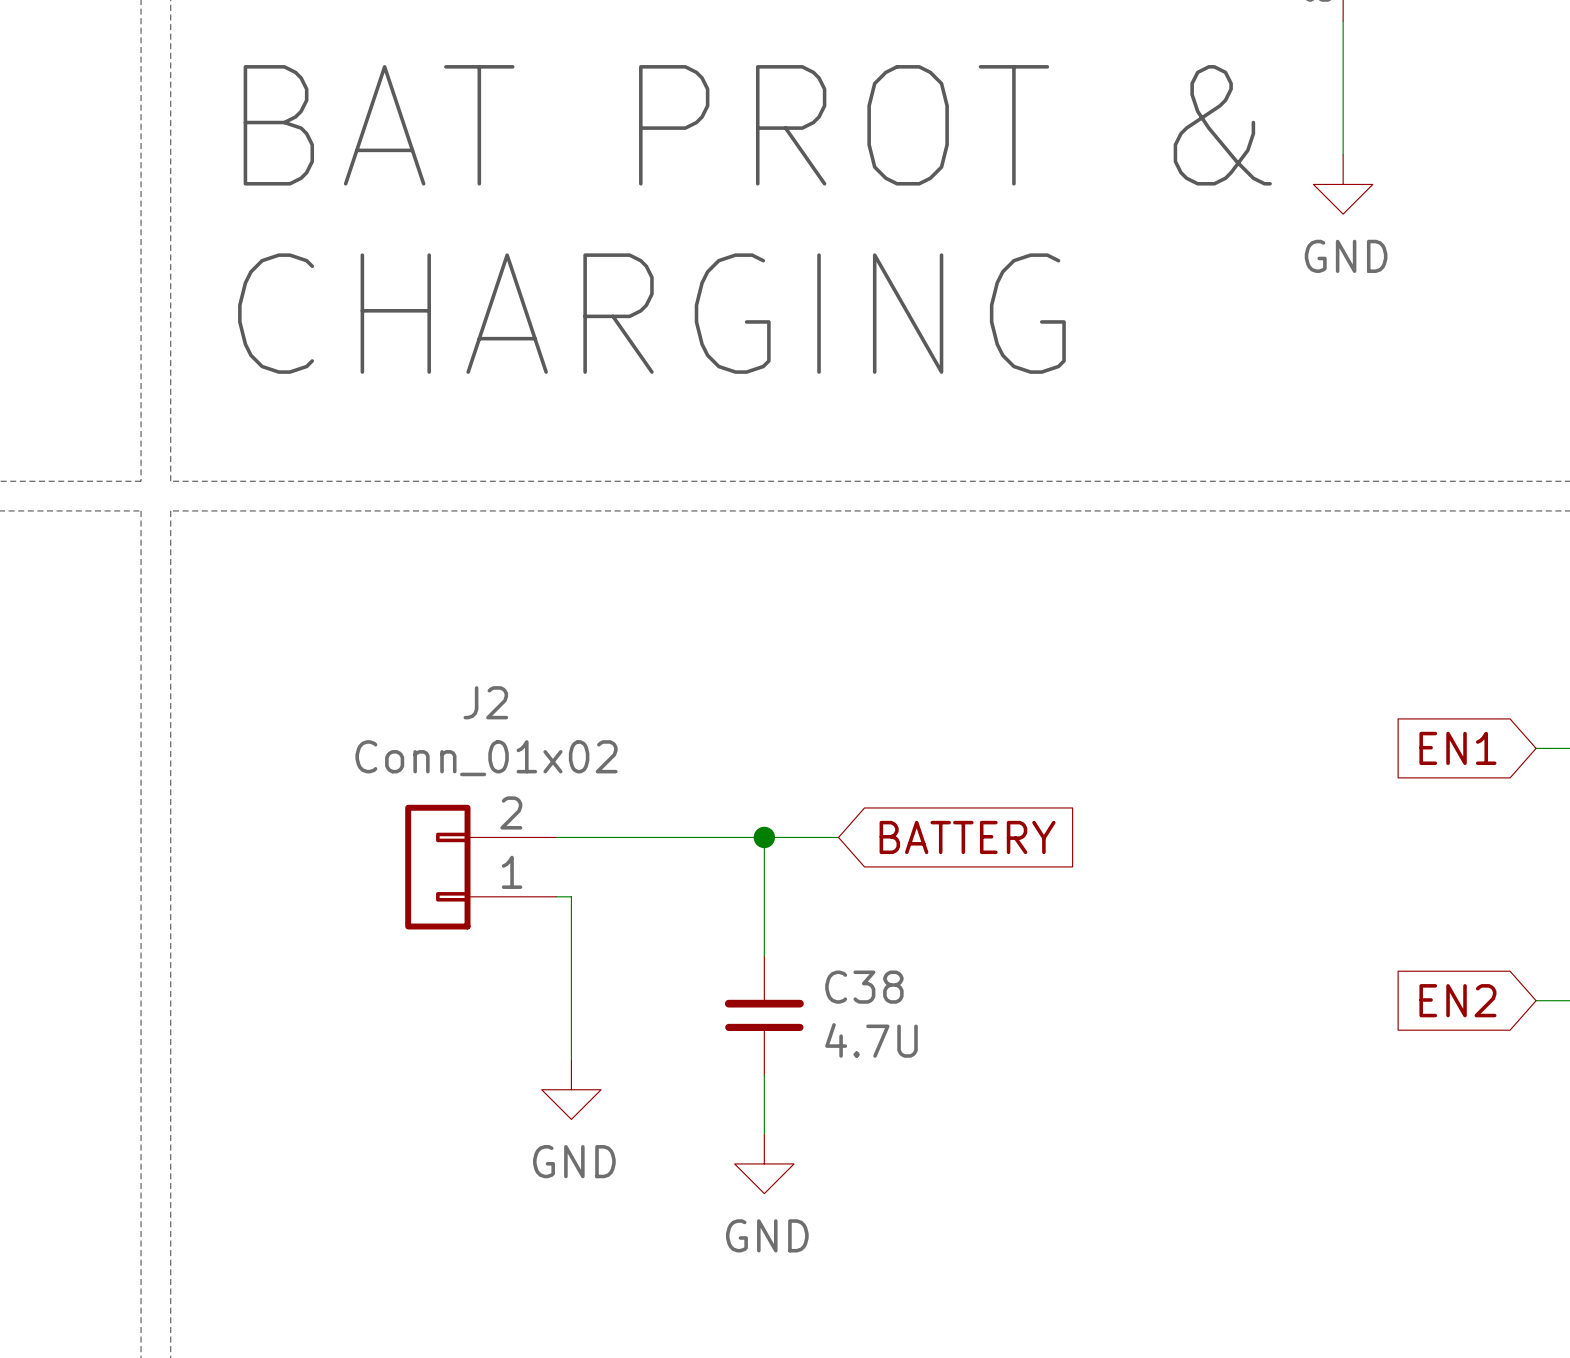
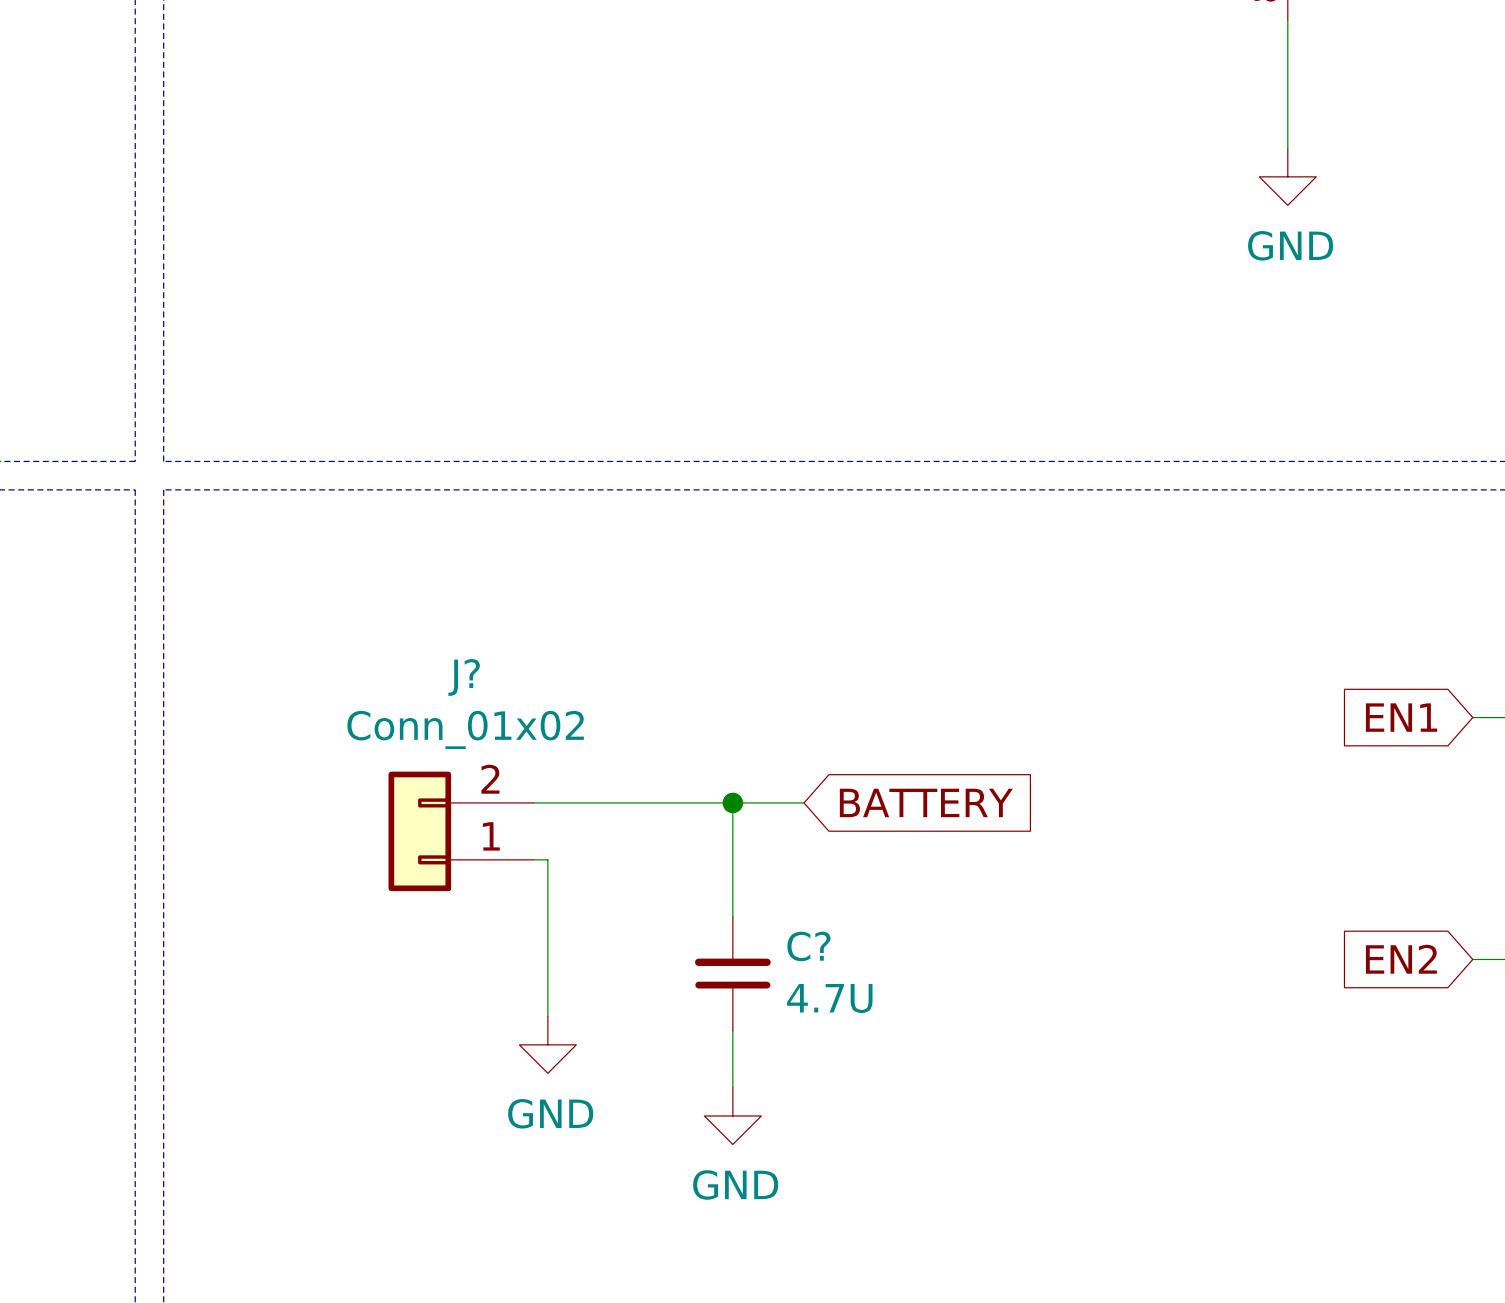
text: BAT PROT & (757, 125) -> none
text: CHARGING (651, 313) -> none
J2 name: J2 (485, 702) -> J? (464, 677)
C38 name: C38 (864, 987) -> C? (808, 946)

